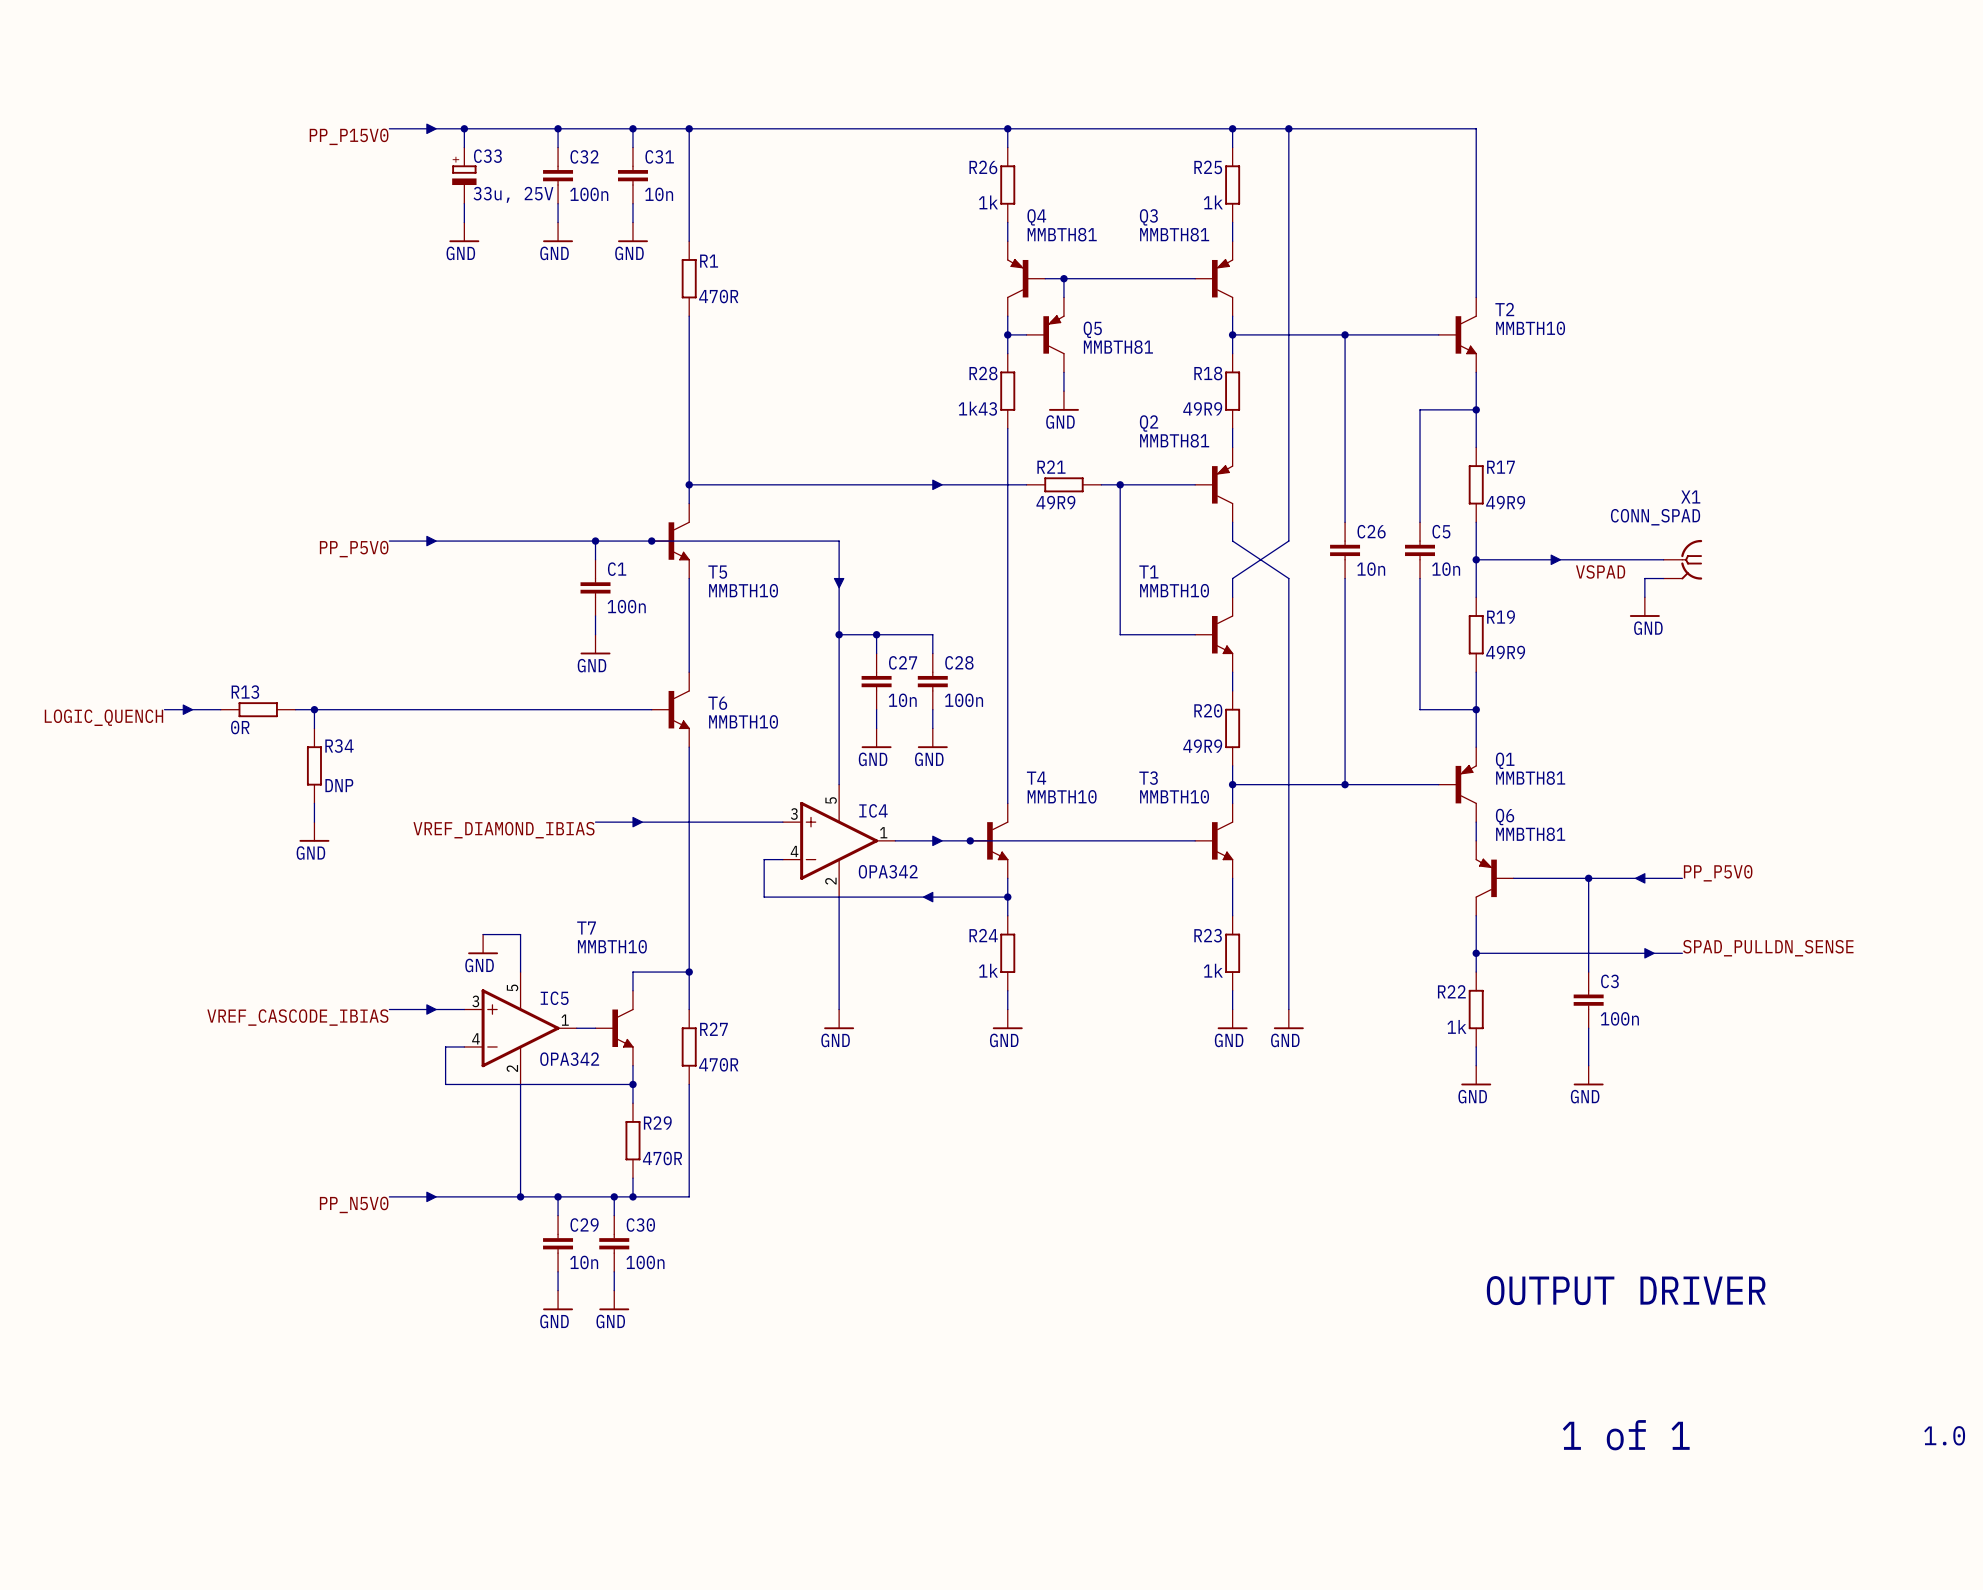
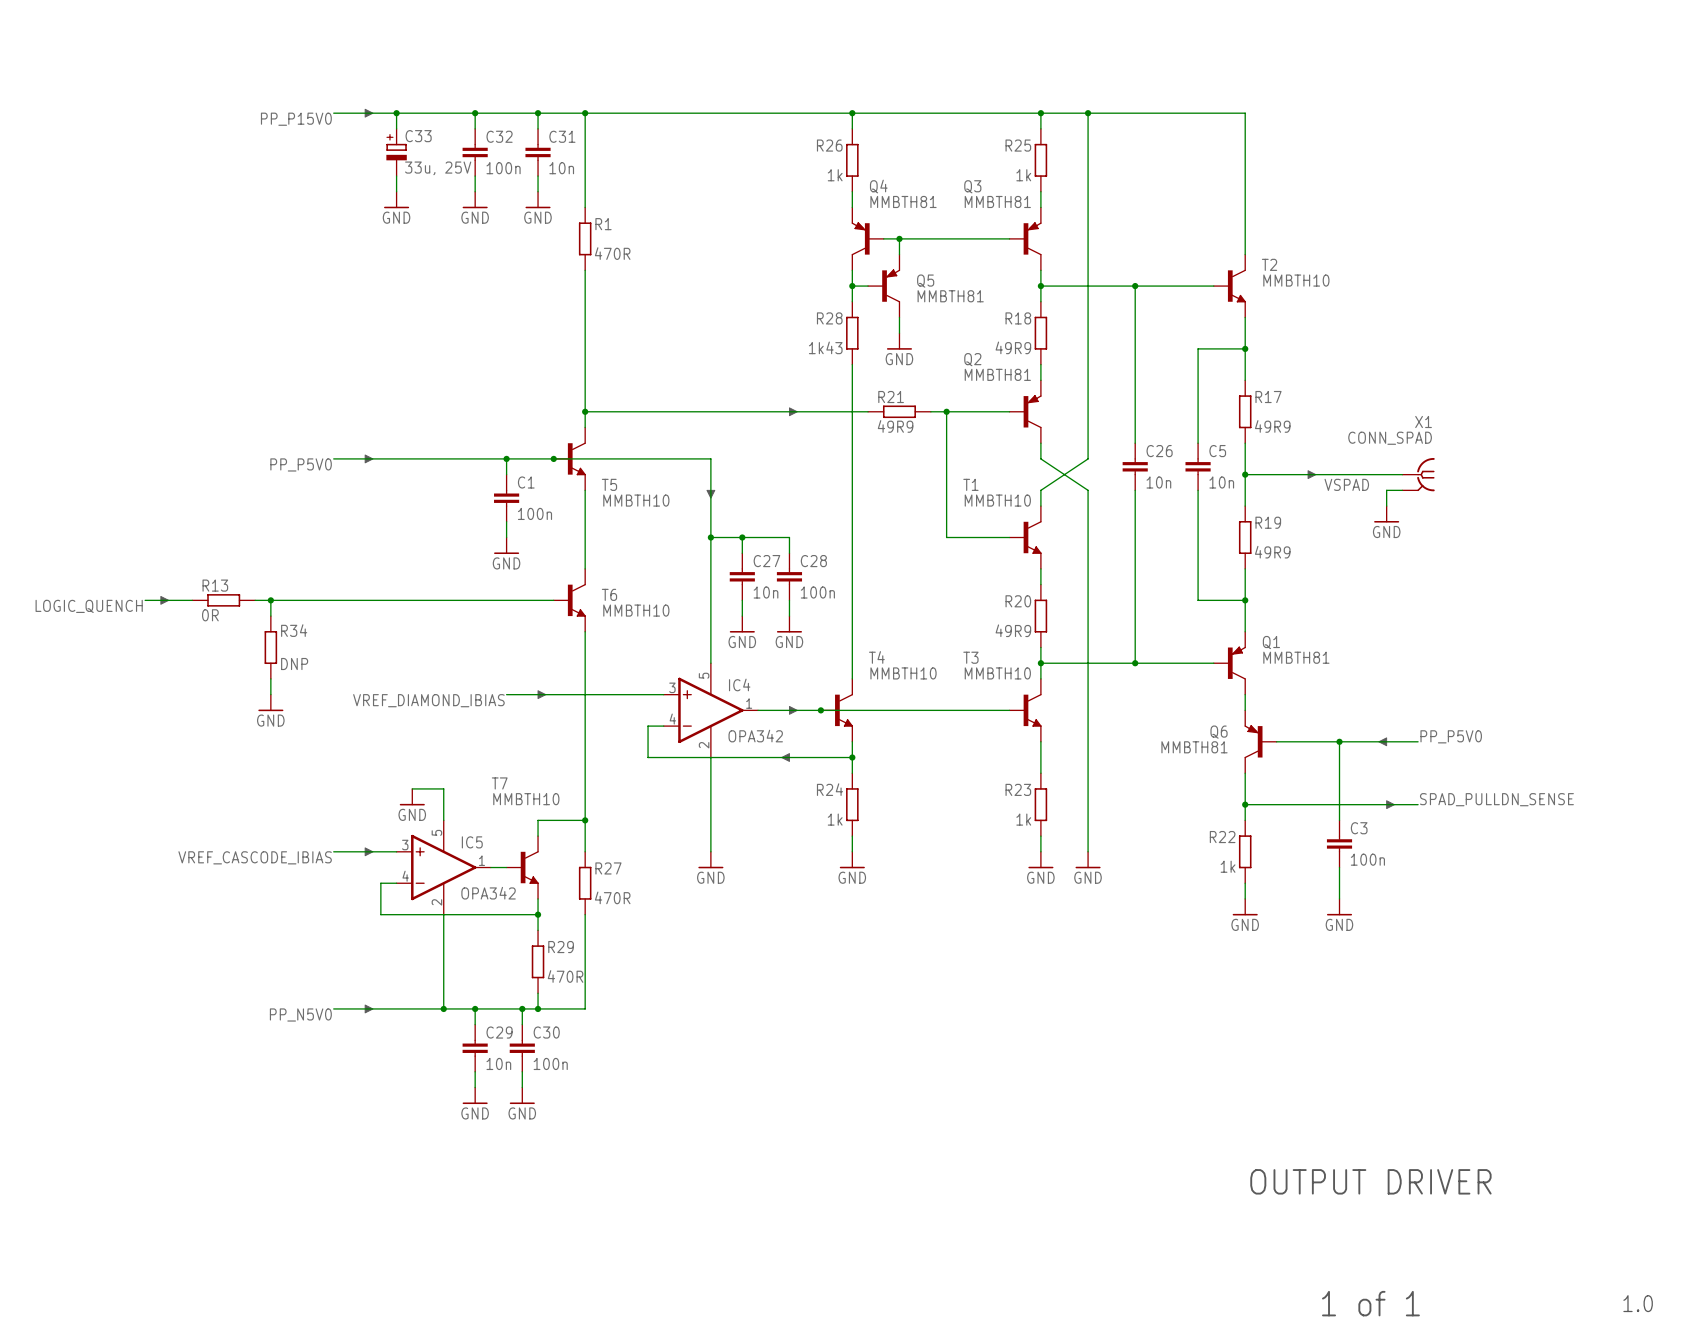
Q6 name position: Q6 (1505, 817) -> Q6 (1219, 732)
Q6 value position: MMBTH81 (1530, 834) -> MMBTH81 (1194, 747)
text position: OUTPUT DRIVER (1626, 1290) -> OUTPUT DRIVER (1370, 1181)
text position: 1 of 1 (1626, 1435) -> 1 of 1 (1370, 1303)
text position: 1.0 (1944, 1435) -> 1.0 (1638, 1303)

